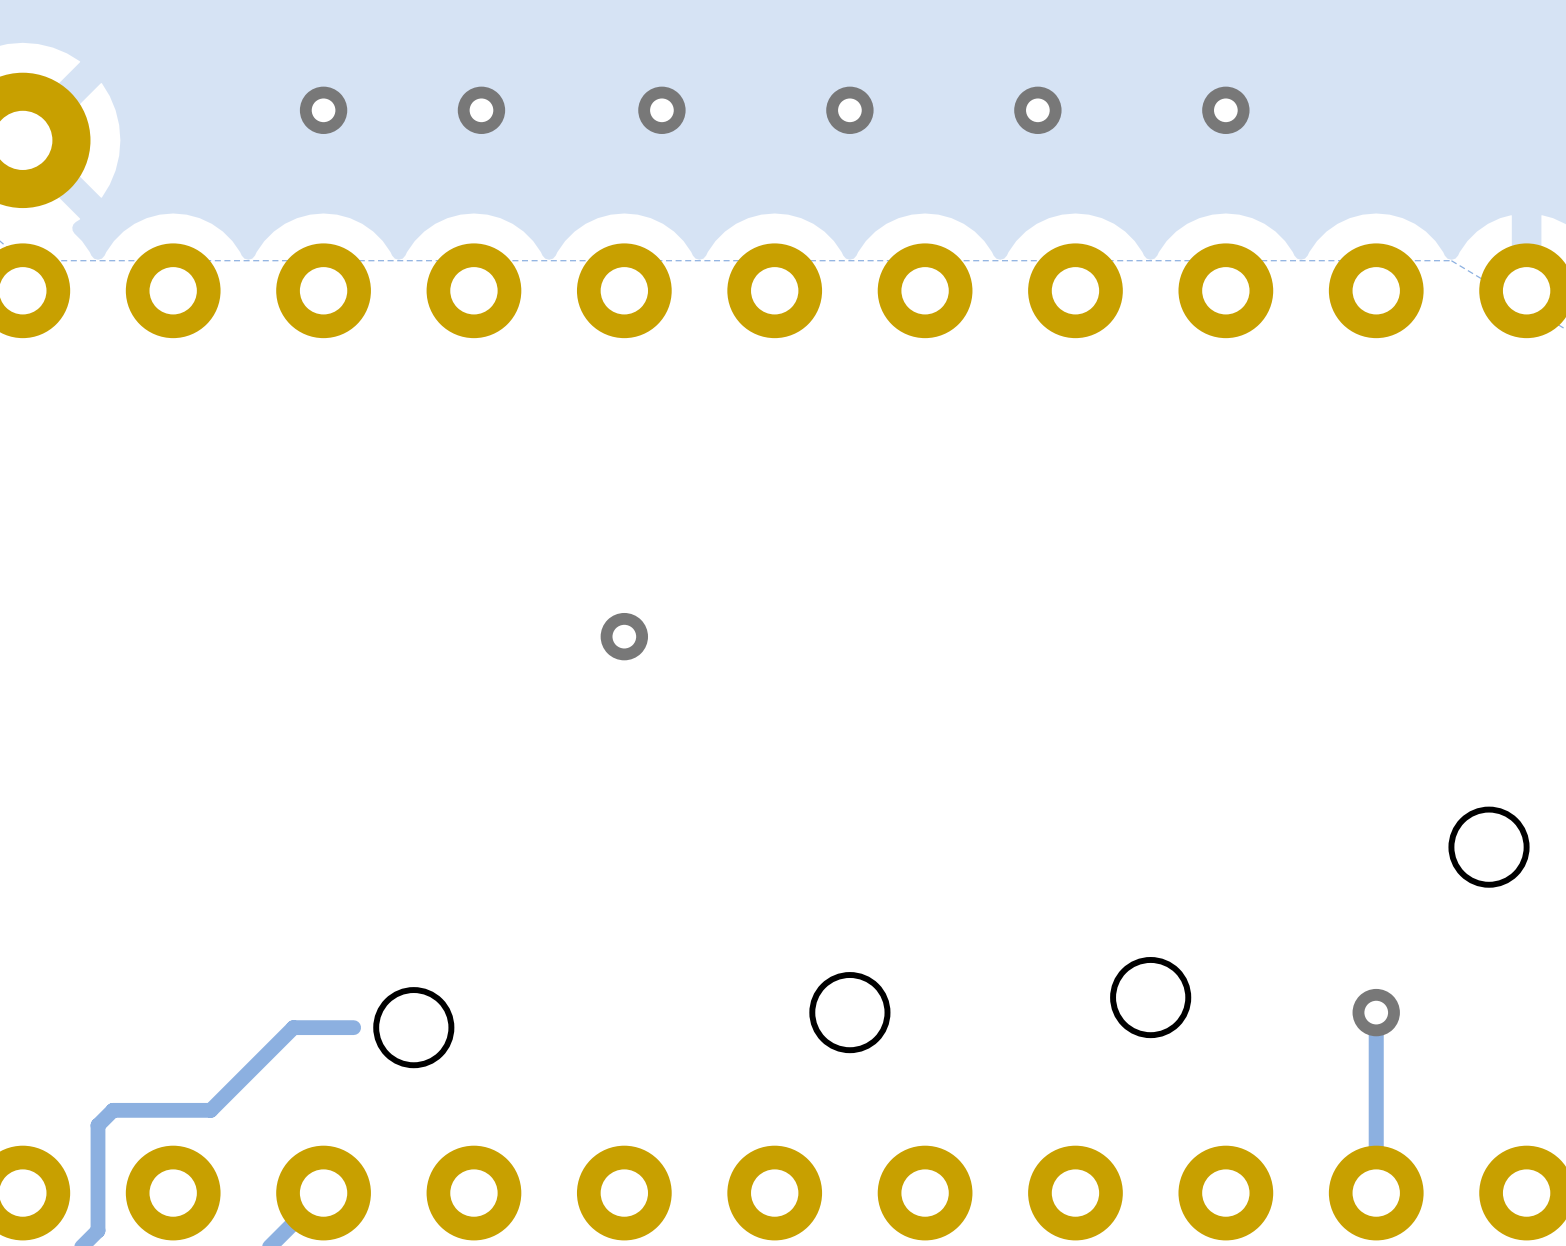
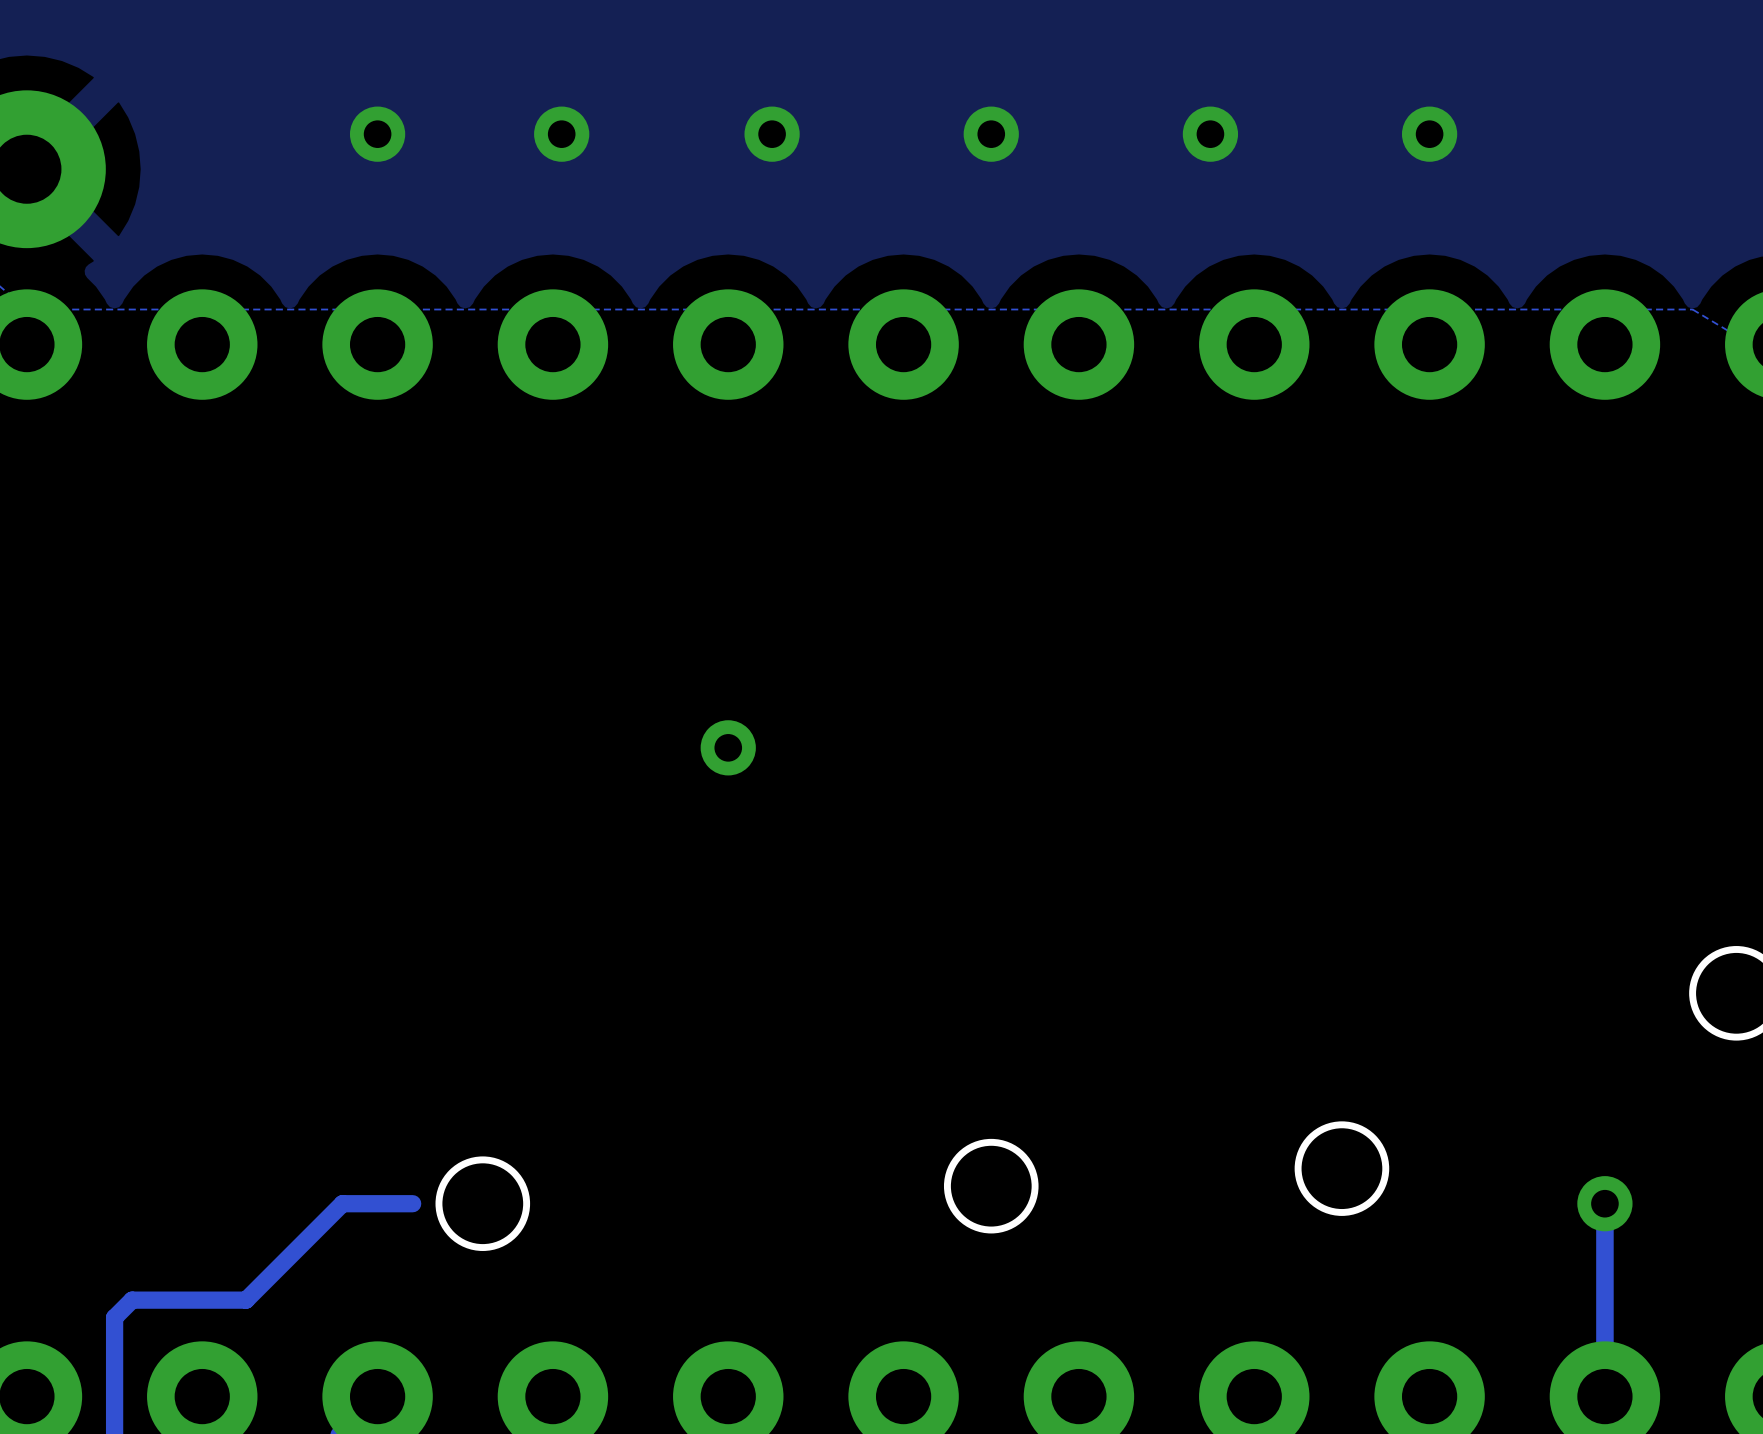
via position: (1376, 1012) -> (1604, 1203)

